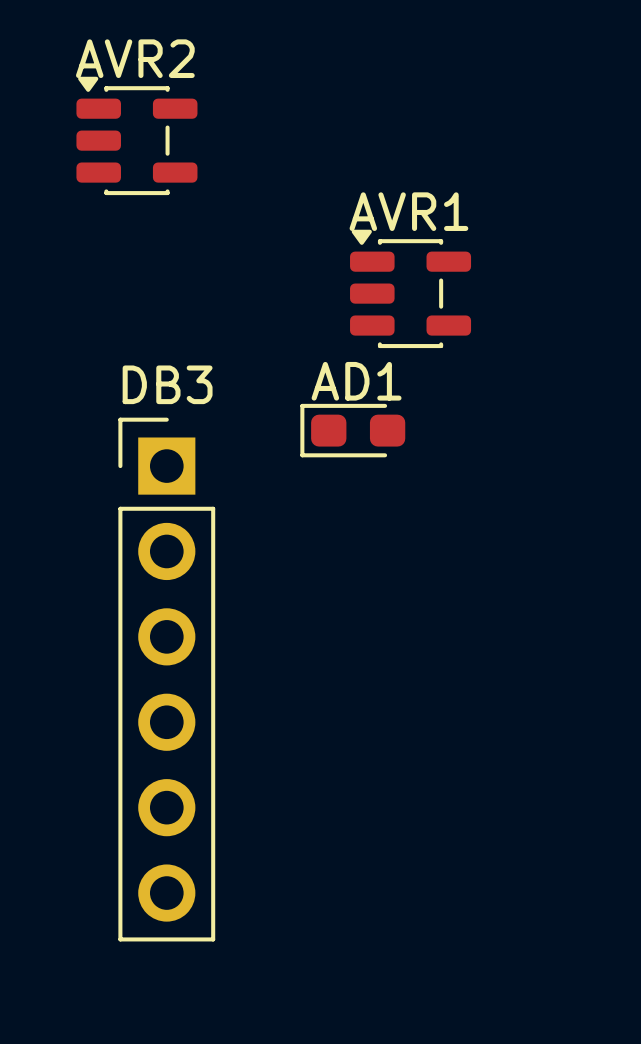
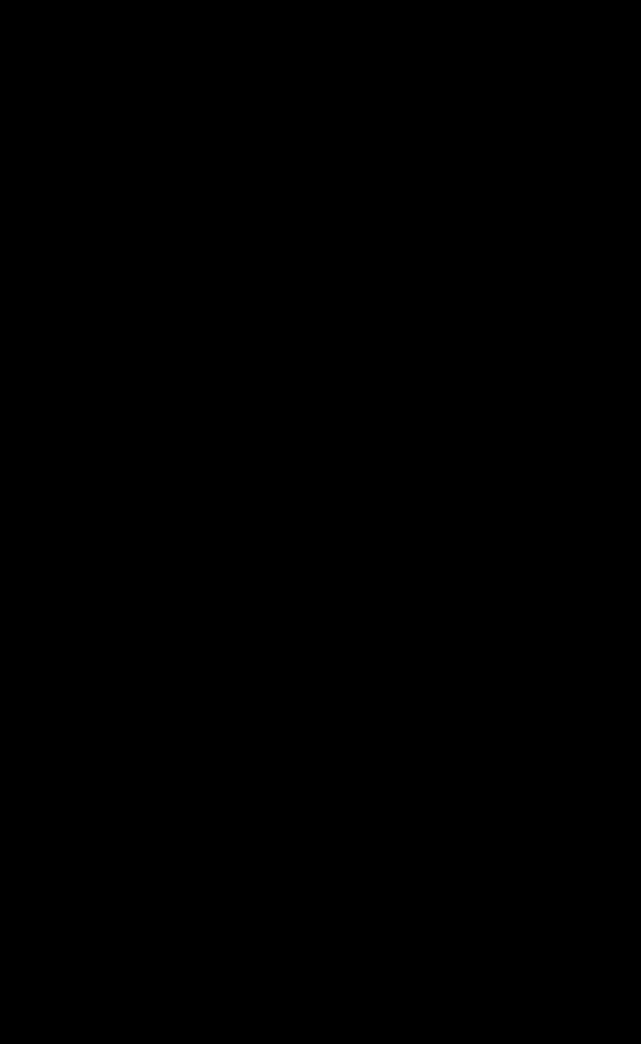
AVR2: (136, 135) -> none
AVR1: (410, 288) -> none
AD1: (352, 430) -> none
DB3: (166, 679) -> none

